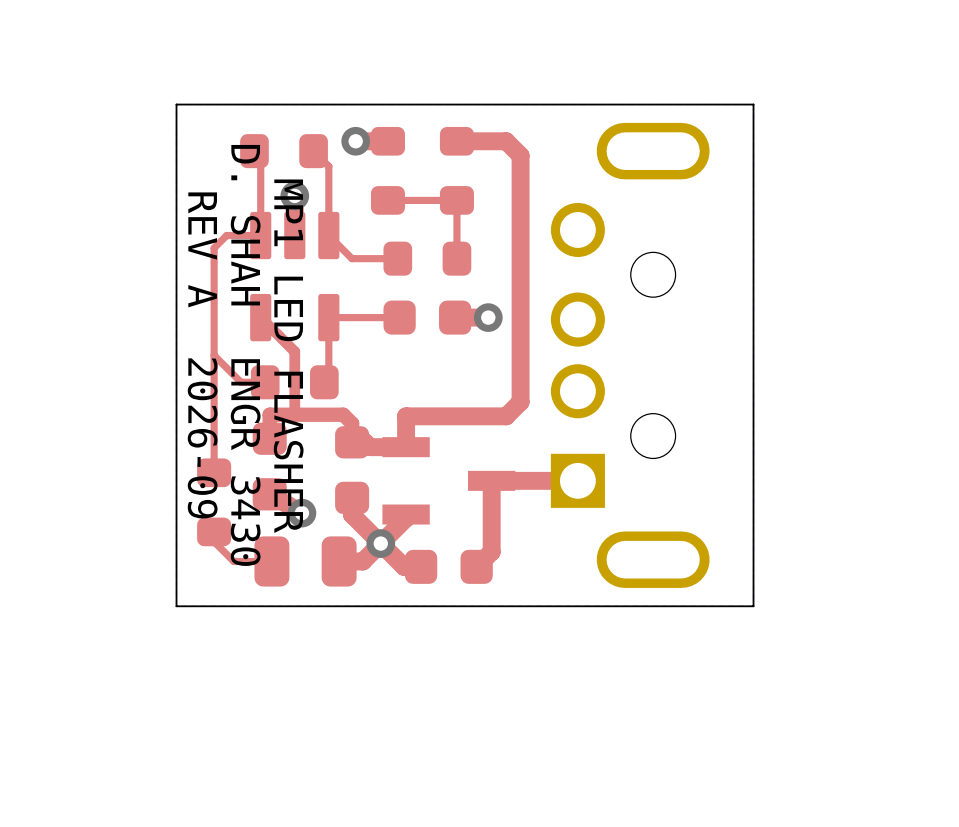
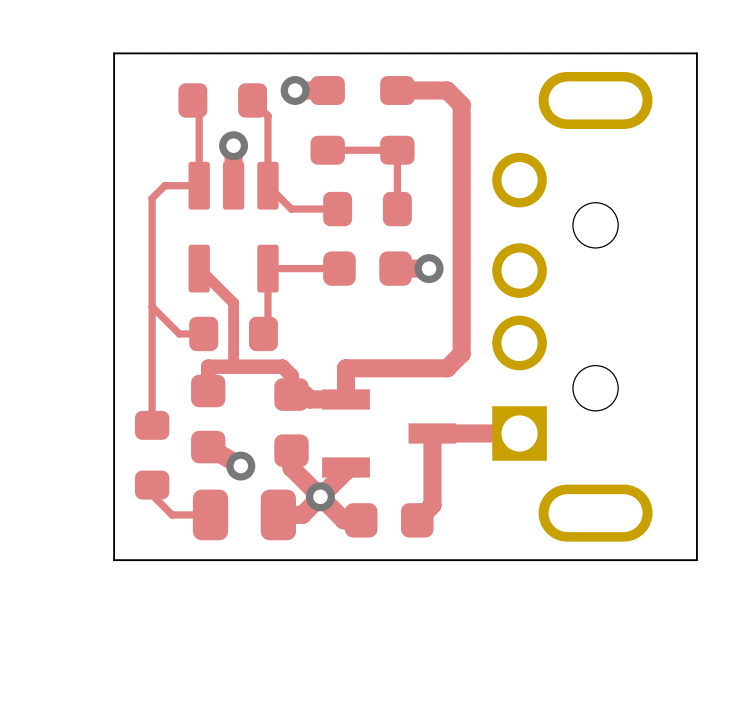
text: REV A 2026-09 (202, 355) -> none
text: D. SHAH ENGR 3430 (245, 355) -> none
text: MP1 LED FLASHER (288, 356) -> none

